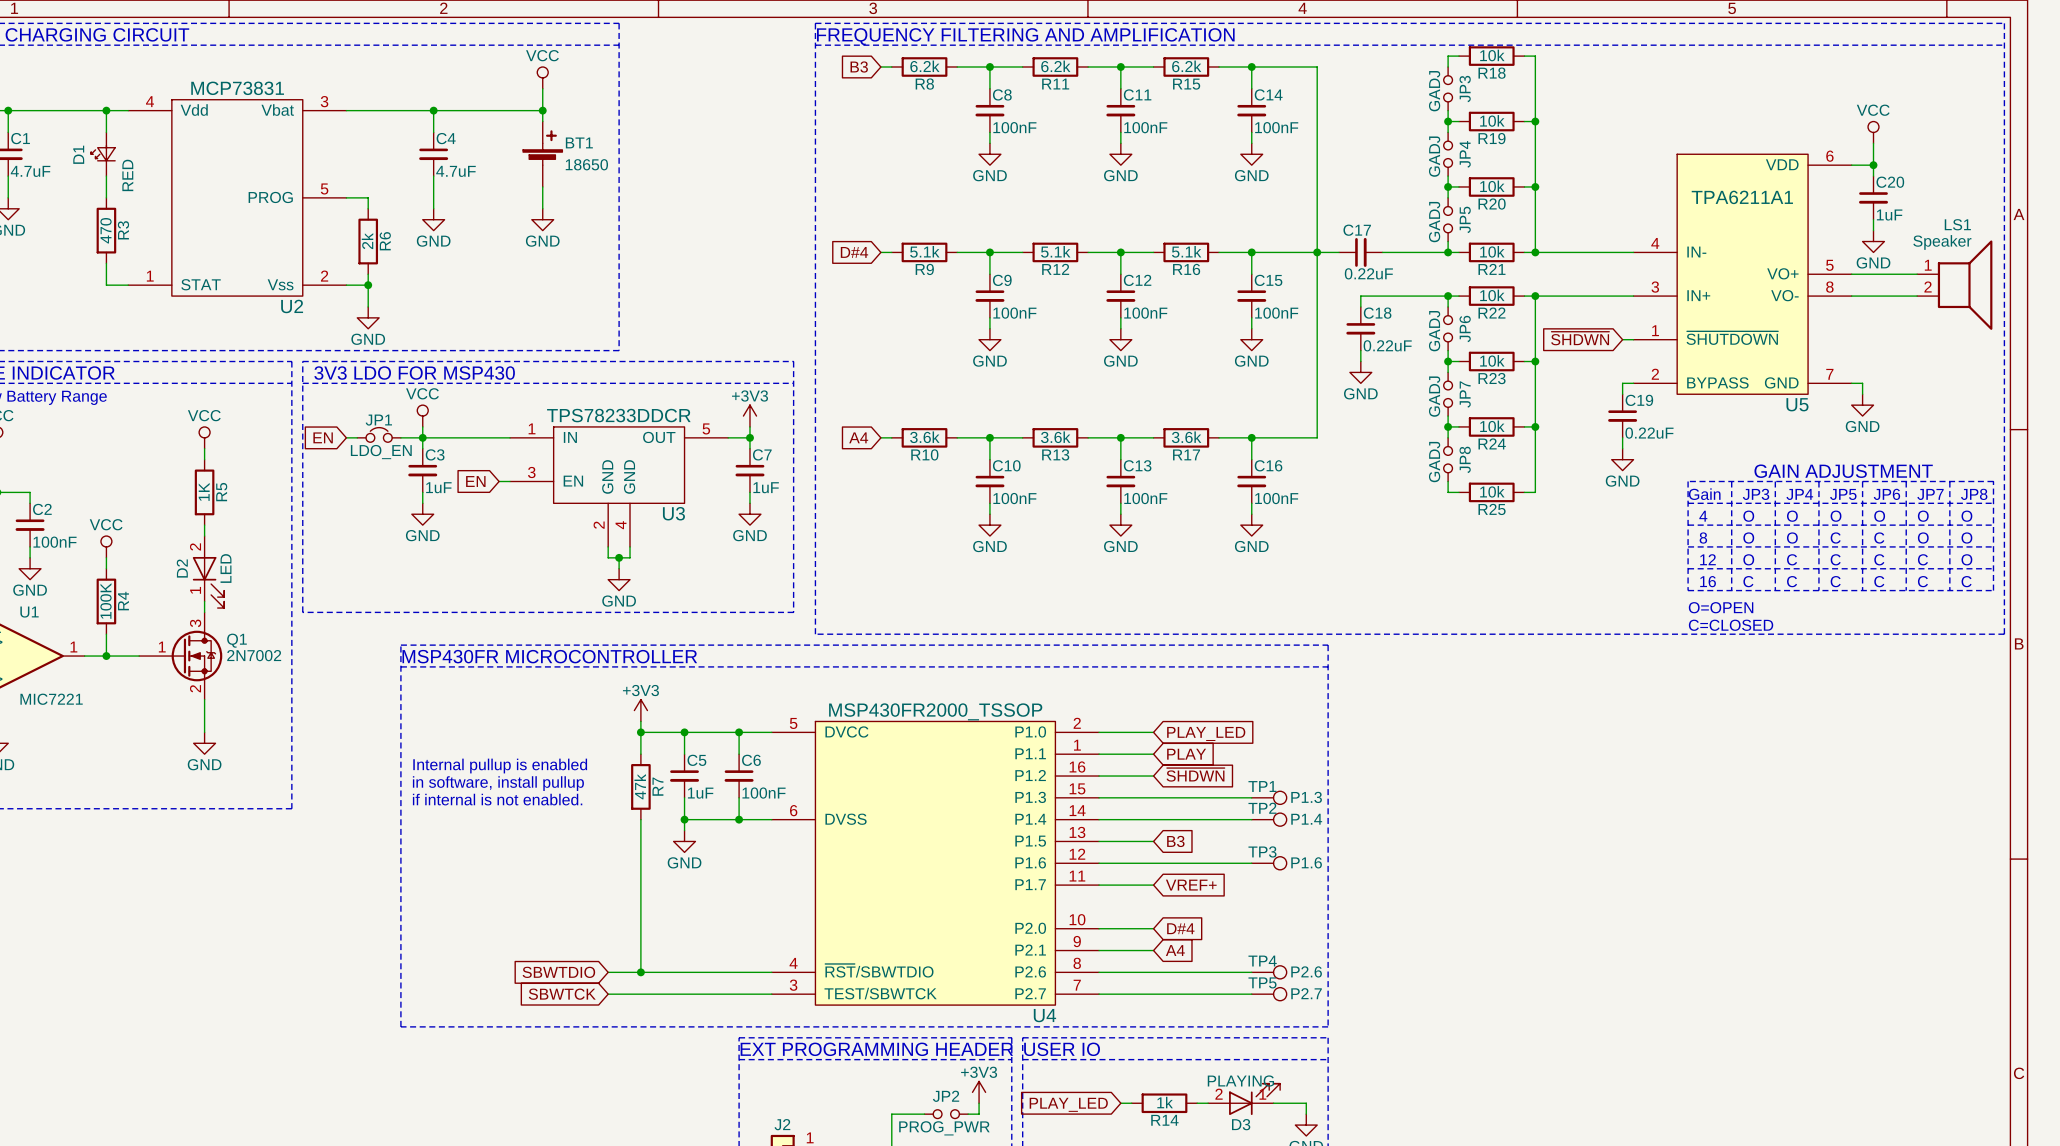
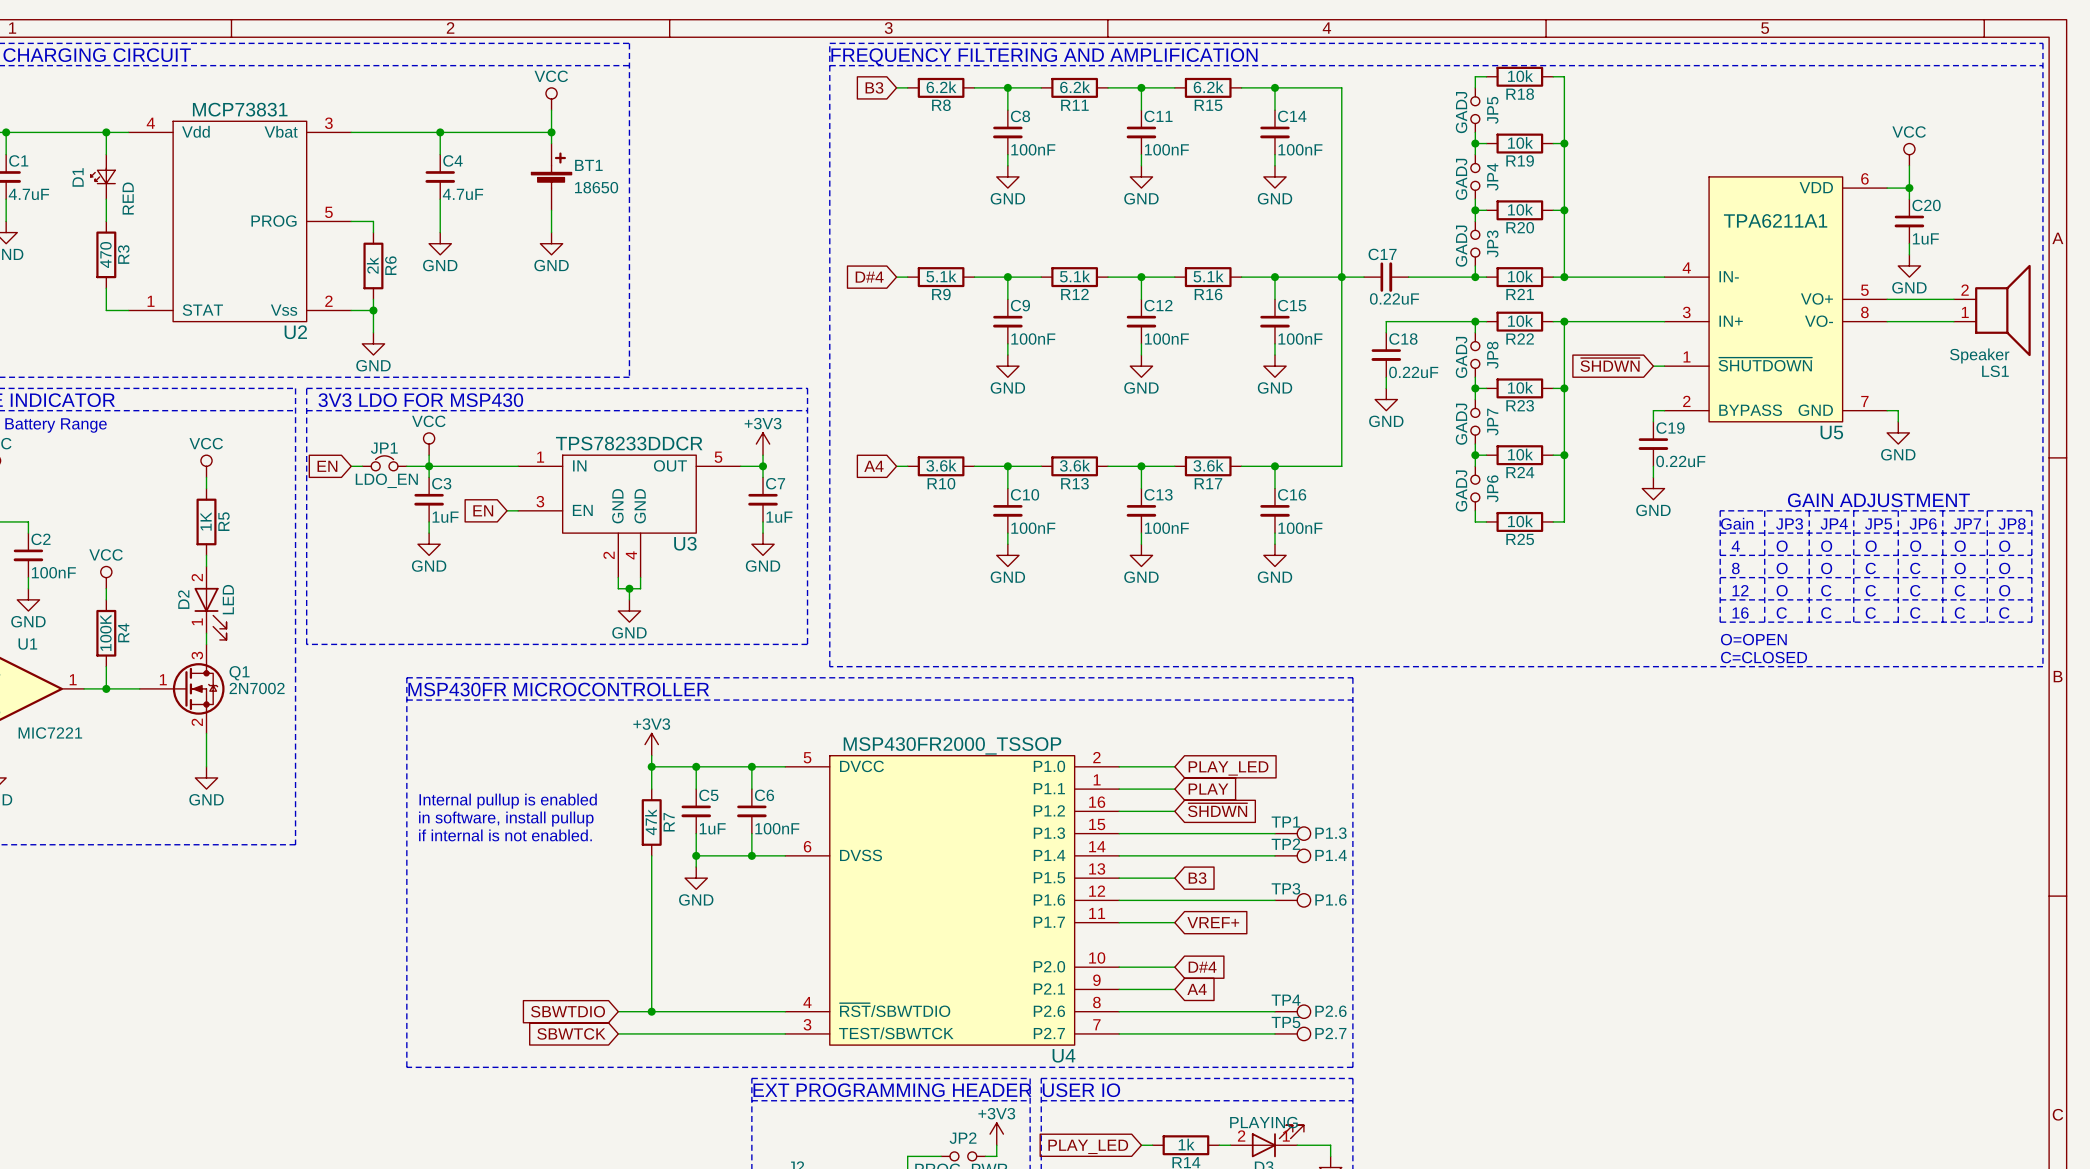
JP3 name: JP3 (1465, 89) -> JP5 (1492, 110)
JP5 name: JP5 (1465, 219) -> JP3 (1492, 243)
LS1 flip: as is (1965, 285) -> up-down (2002, 310)
JP6 name: JP6 (1465, 329) -> JP8 (1492, 355)
JP8 name: JP8 (1465, 459) -> JP6 (1492, 488)

